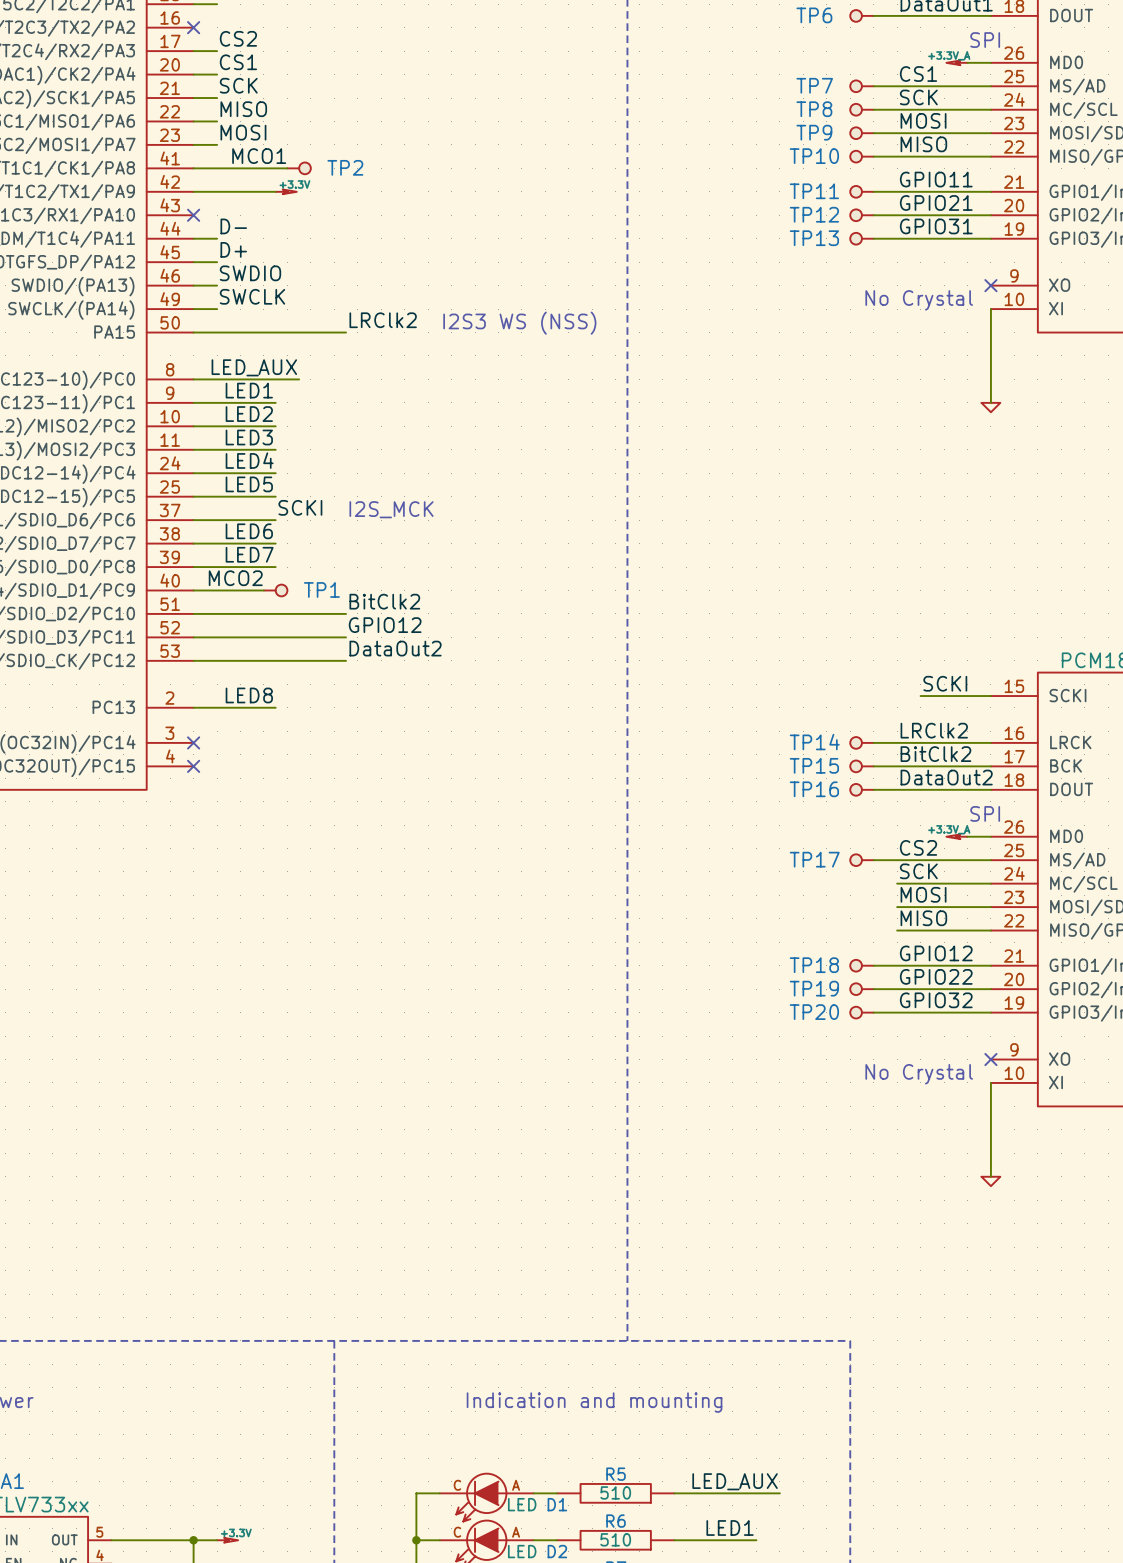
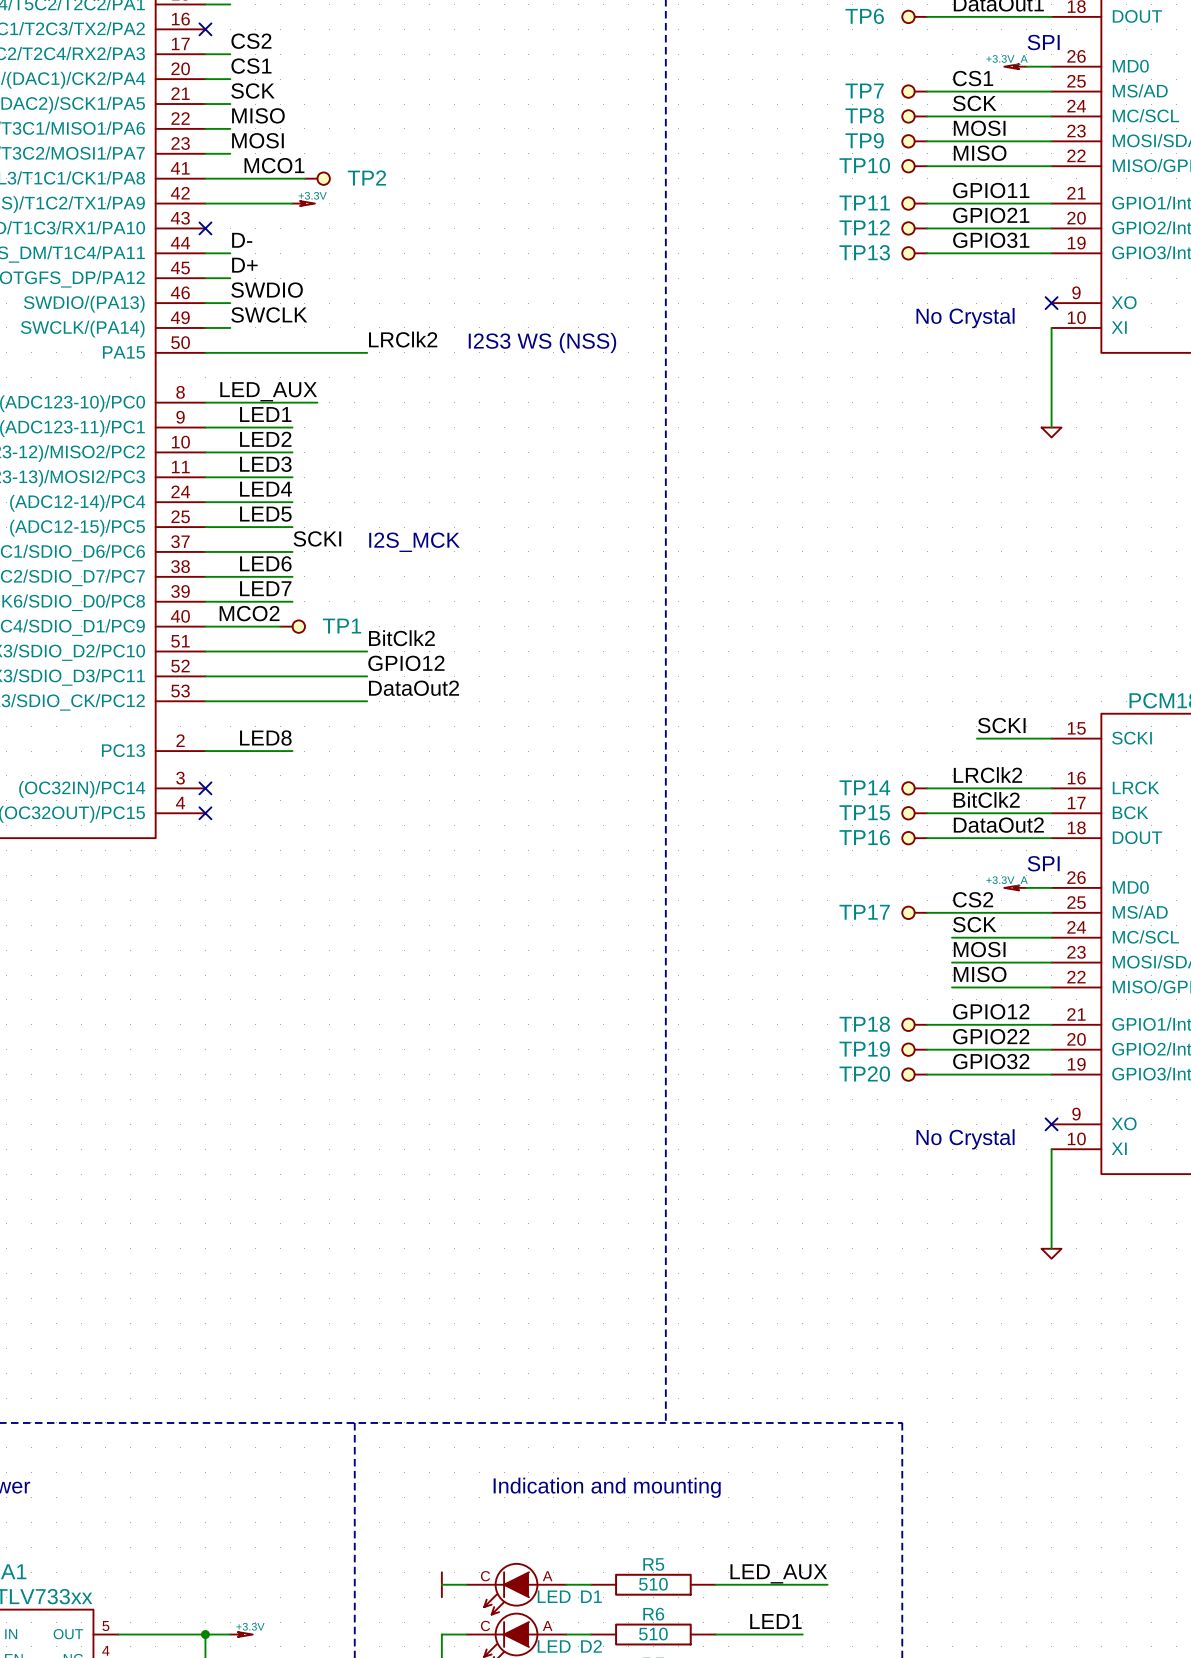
wire: (416, 1493) (416, 1540) -> none
power symbol: none -> (441, 1584)
junction: (416, 1540) -> none

